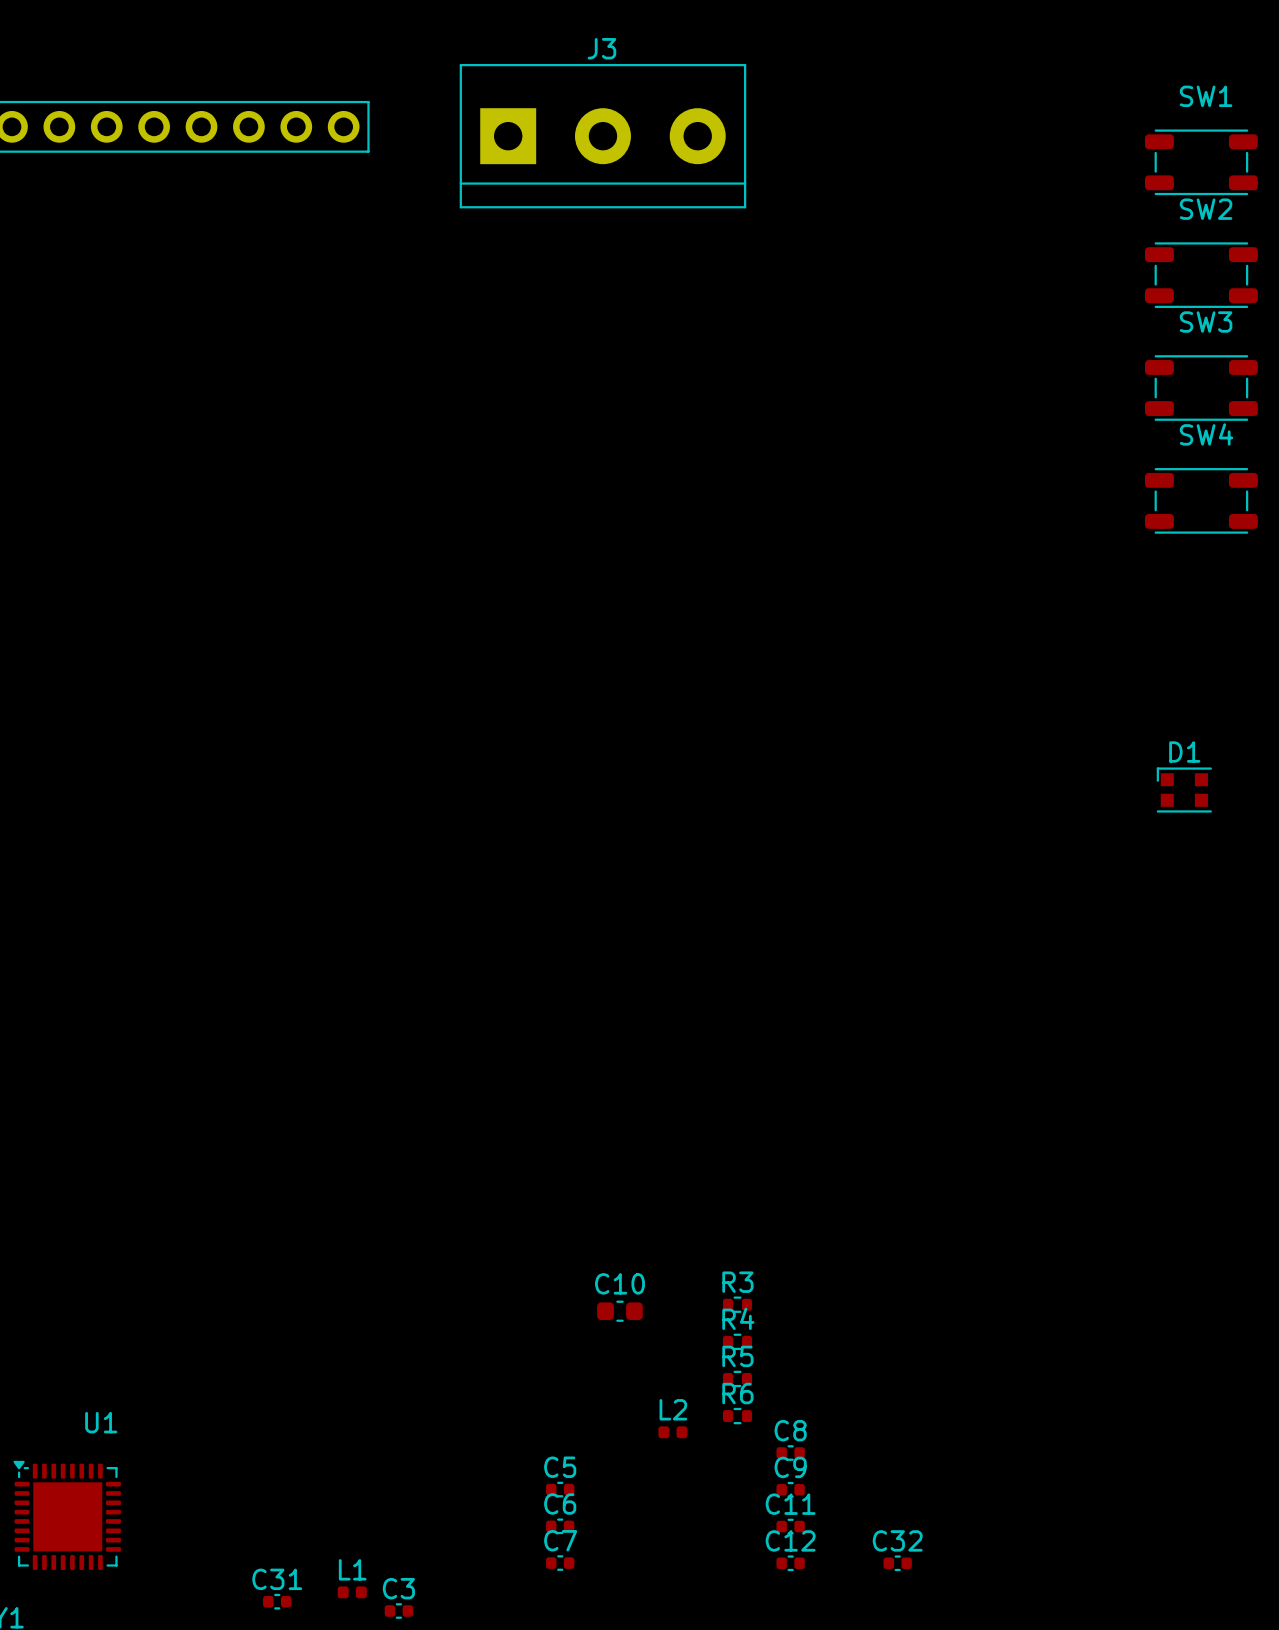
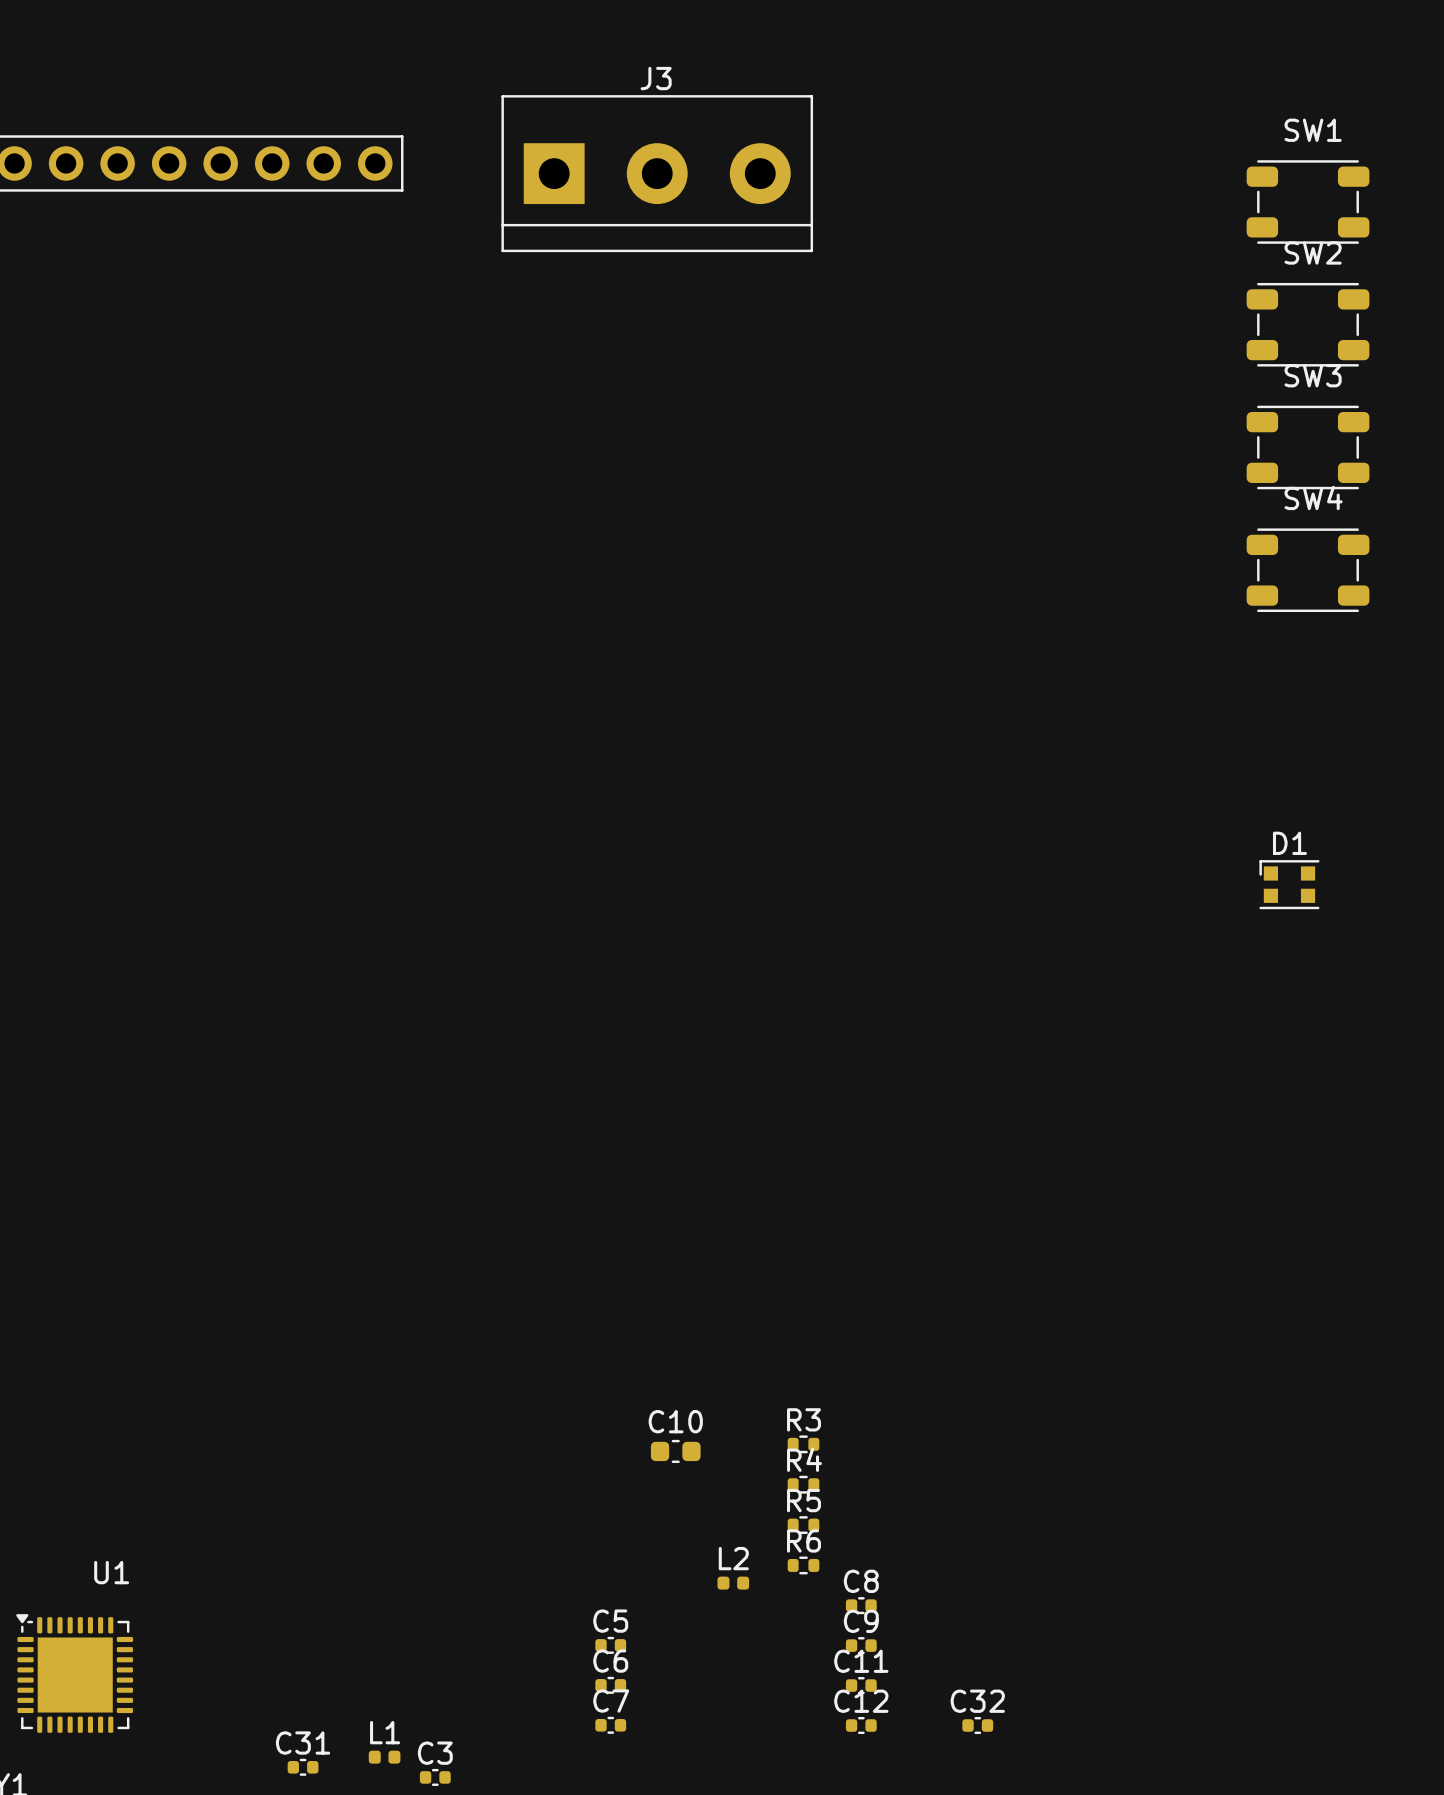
SW1 footprint: [1144, 129, 1258, 196] -> [1246, 160, 1370, 244]
SW2 footprint: [1144, 242, 1258, 308] -> [1246, 282, 1370, 367]
SW3 footprint: [1144, 355, 1258, 421] -> [1246, 405, 1370, 490]
SW4 footprint: [1144, 468, 1258, 534] -> [1246, 528, 1370, 613]

